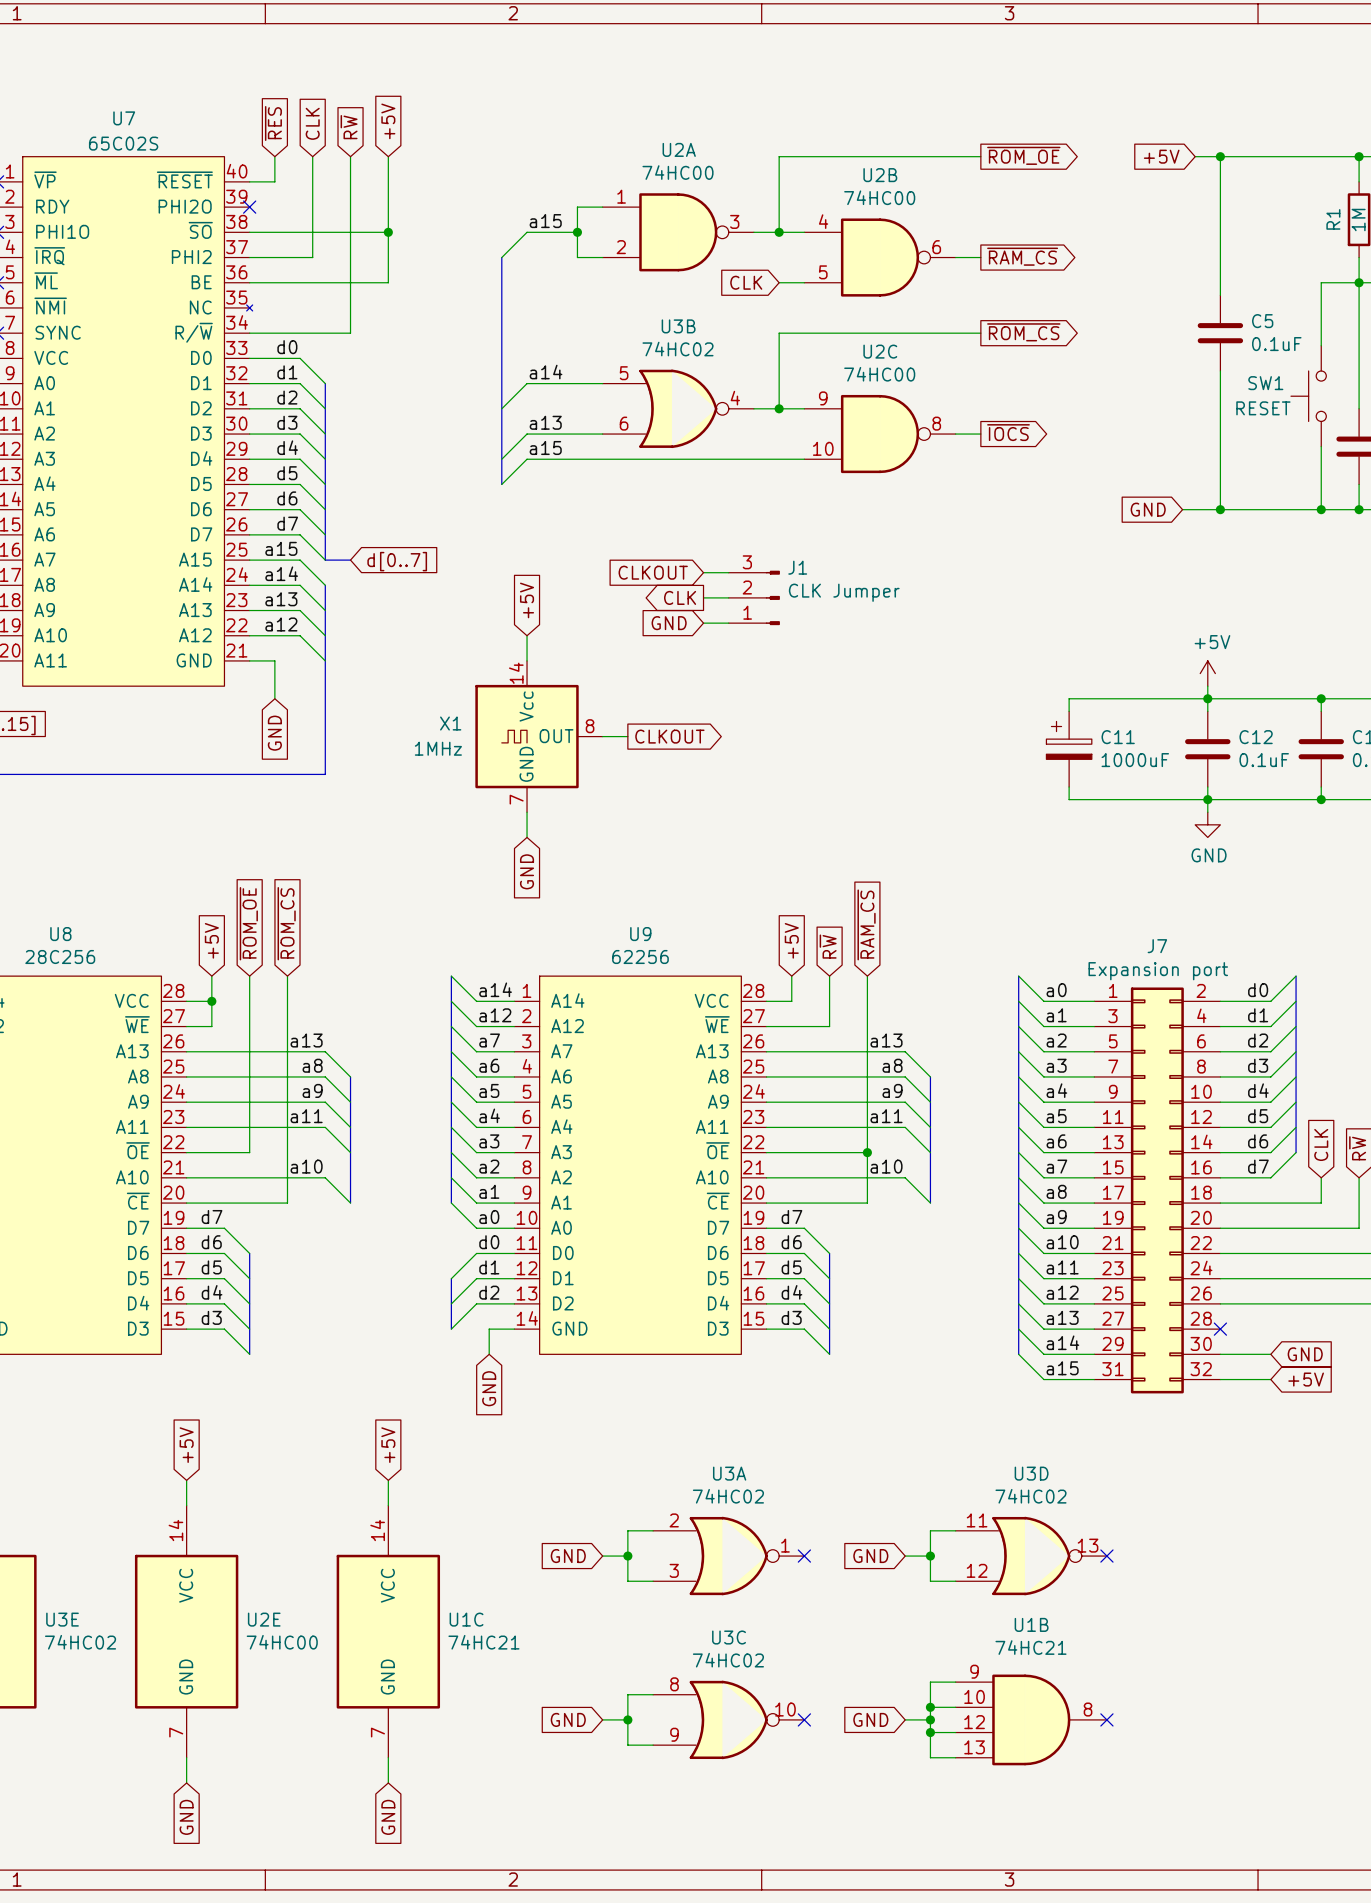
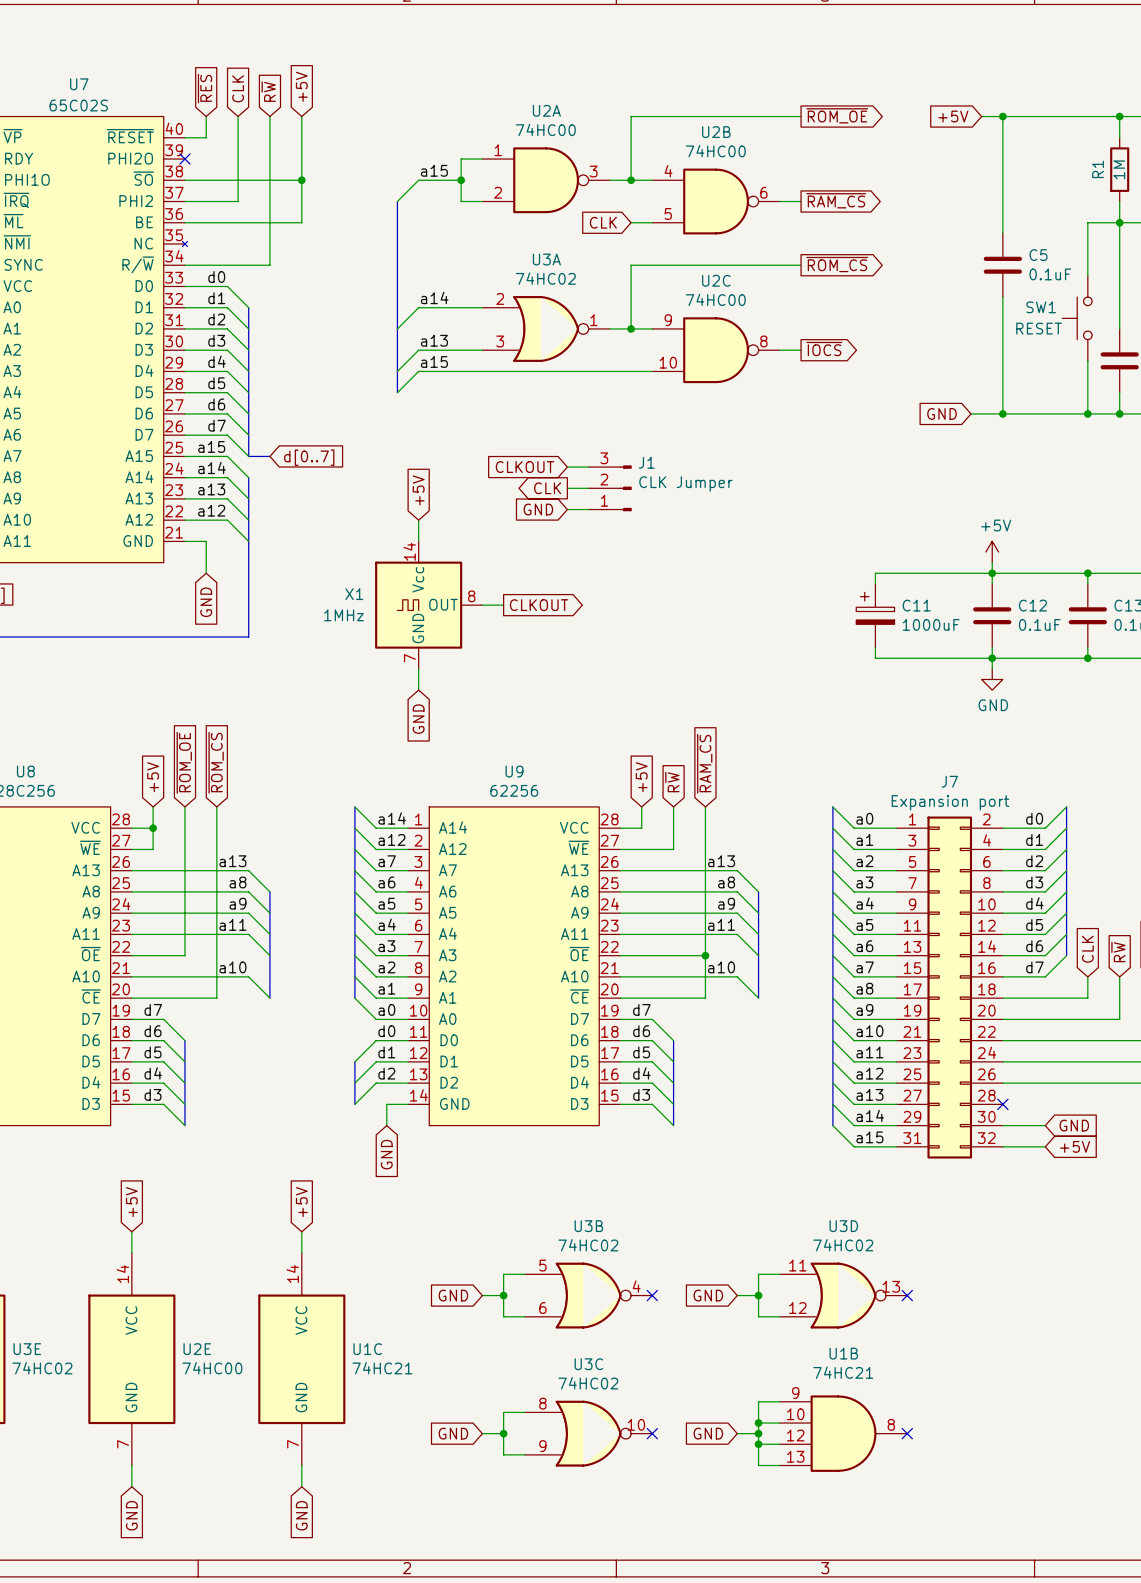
U3B position: (678, 408) -> (588, 1295)
U3A position: (728, 1556) -> (546, 328)

